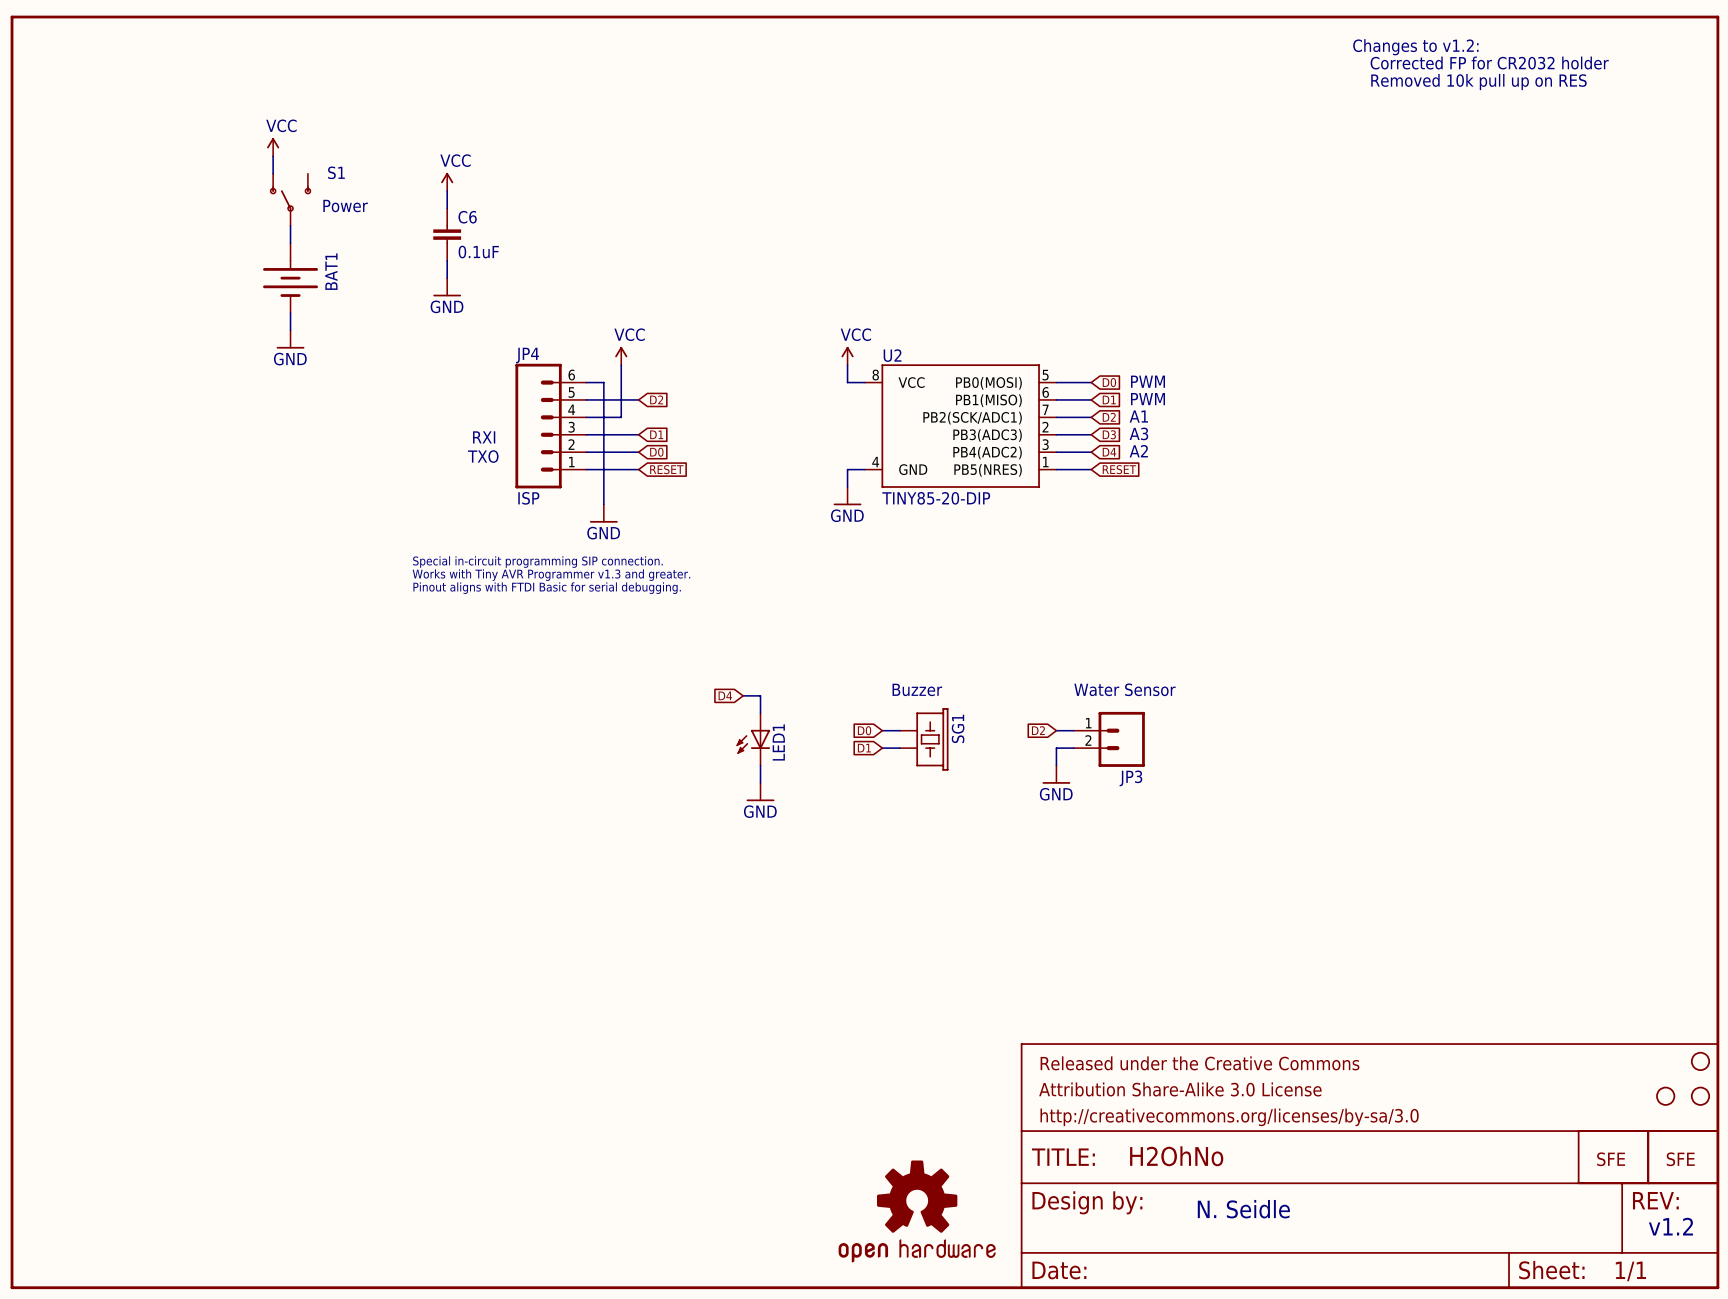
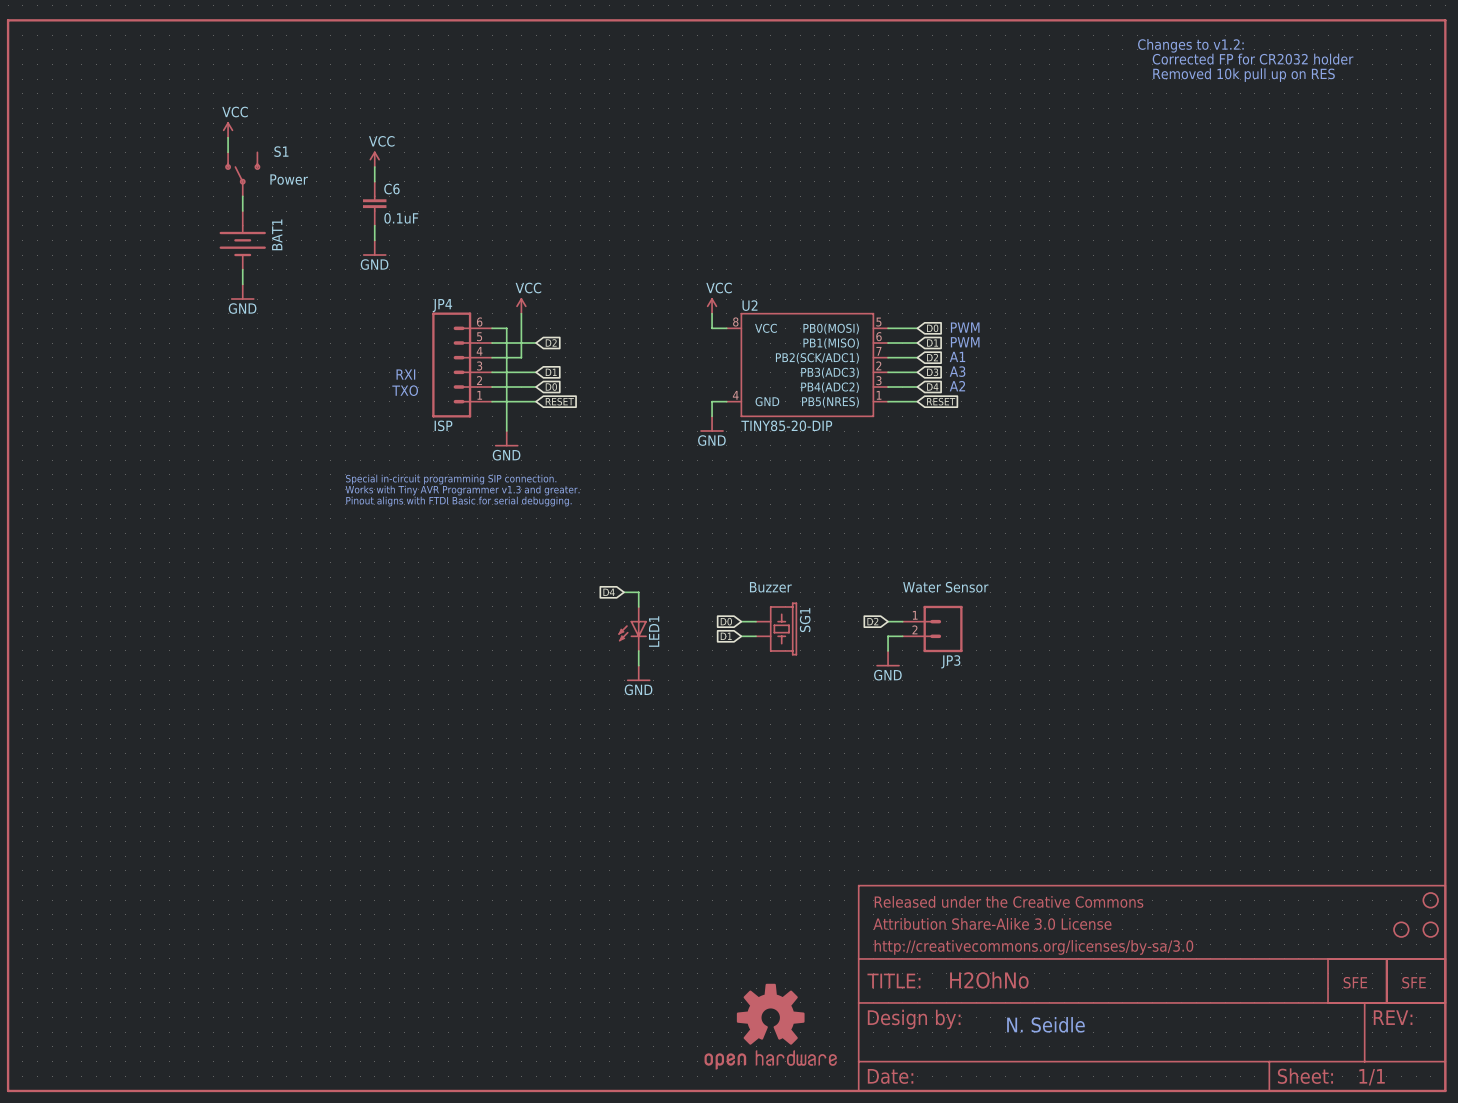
text: v1.2 (1670, 1226) -> none

